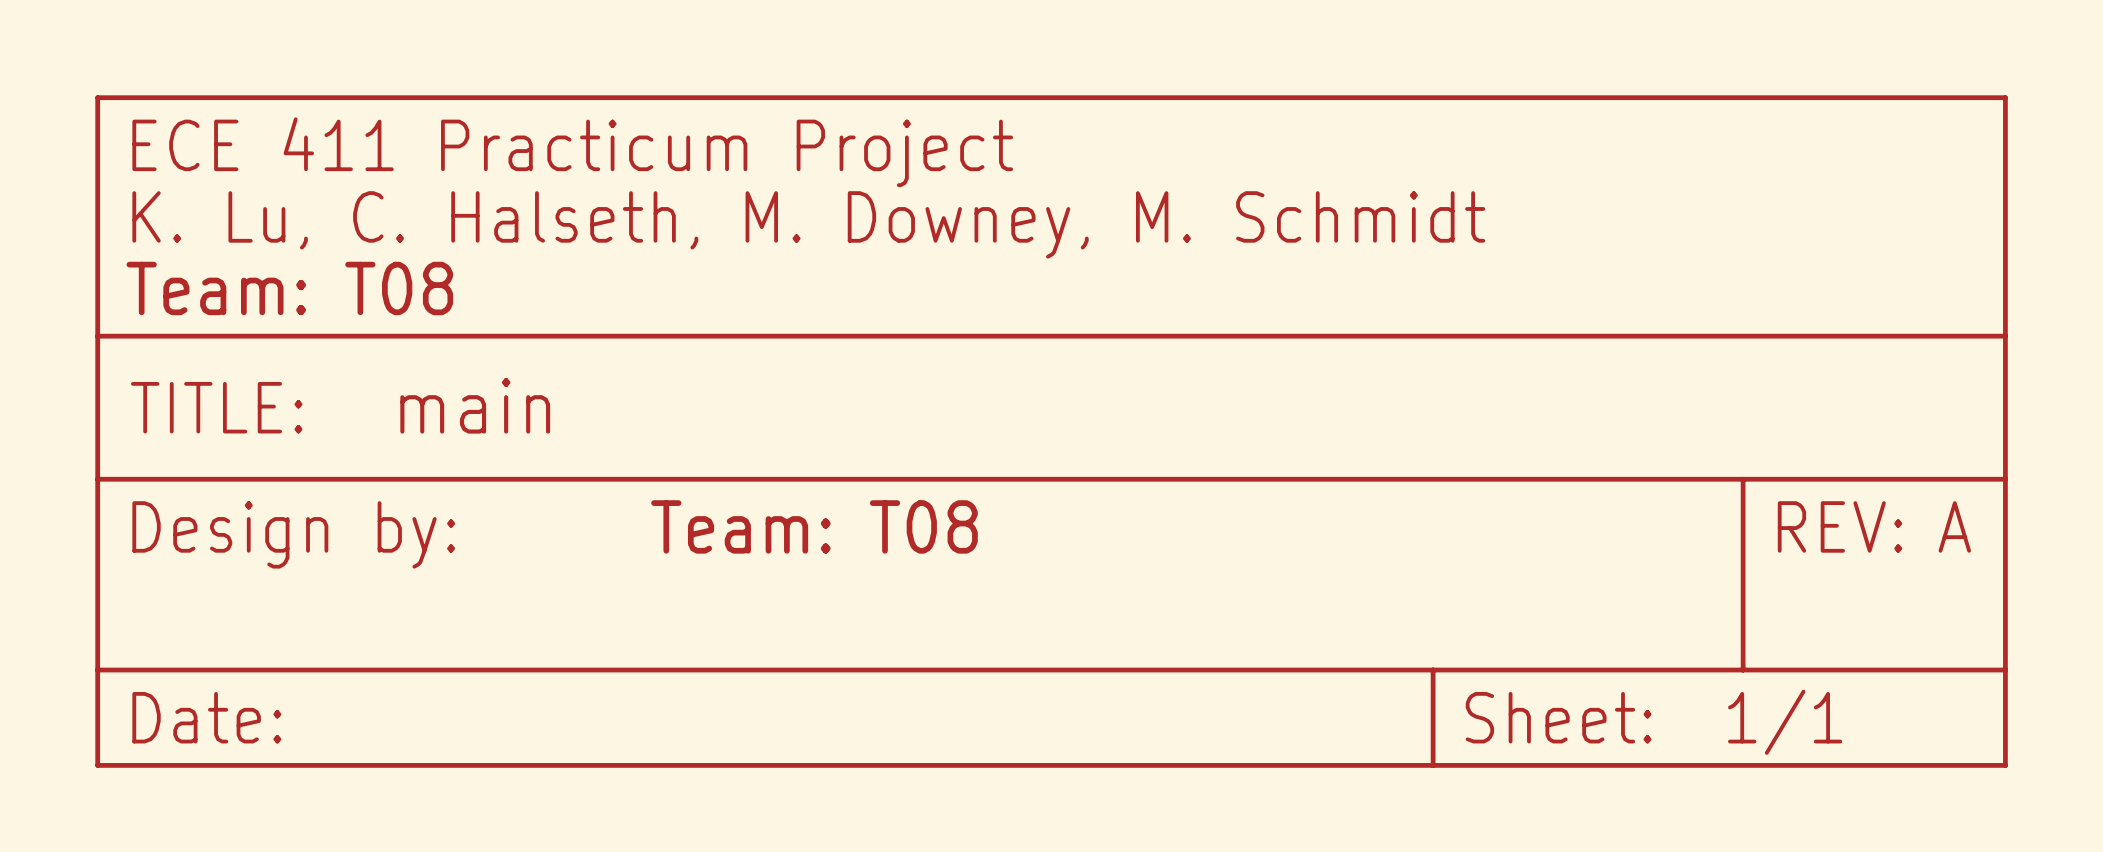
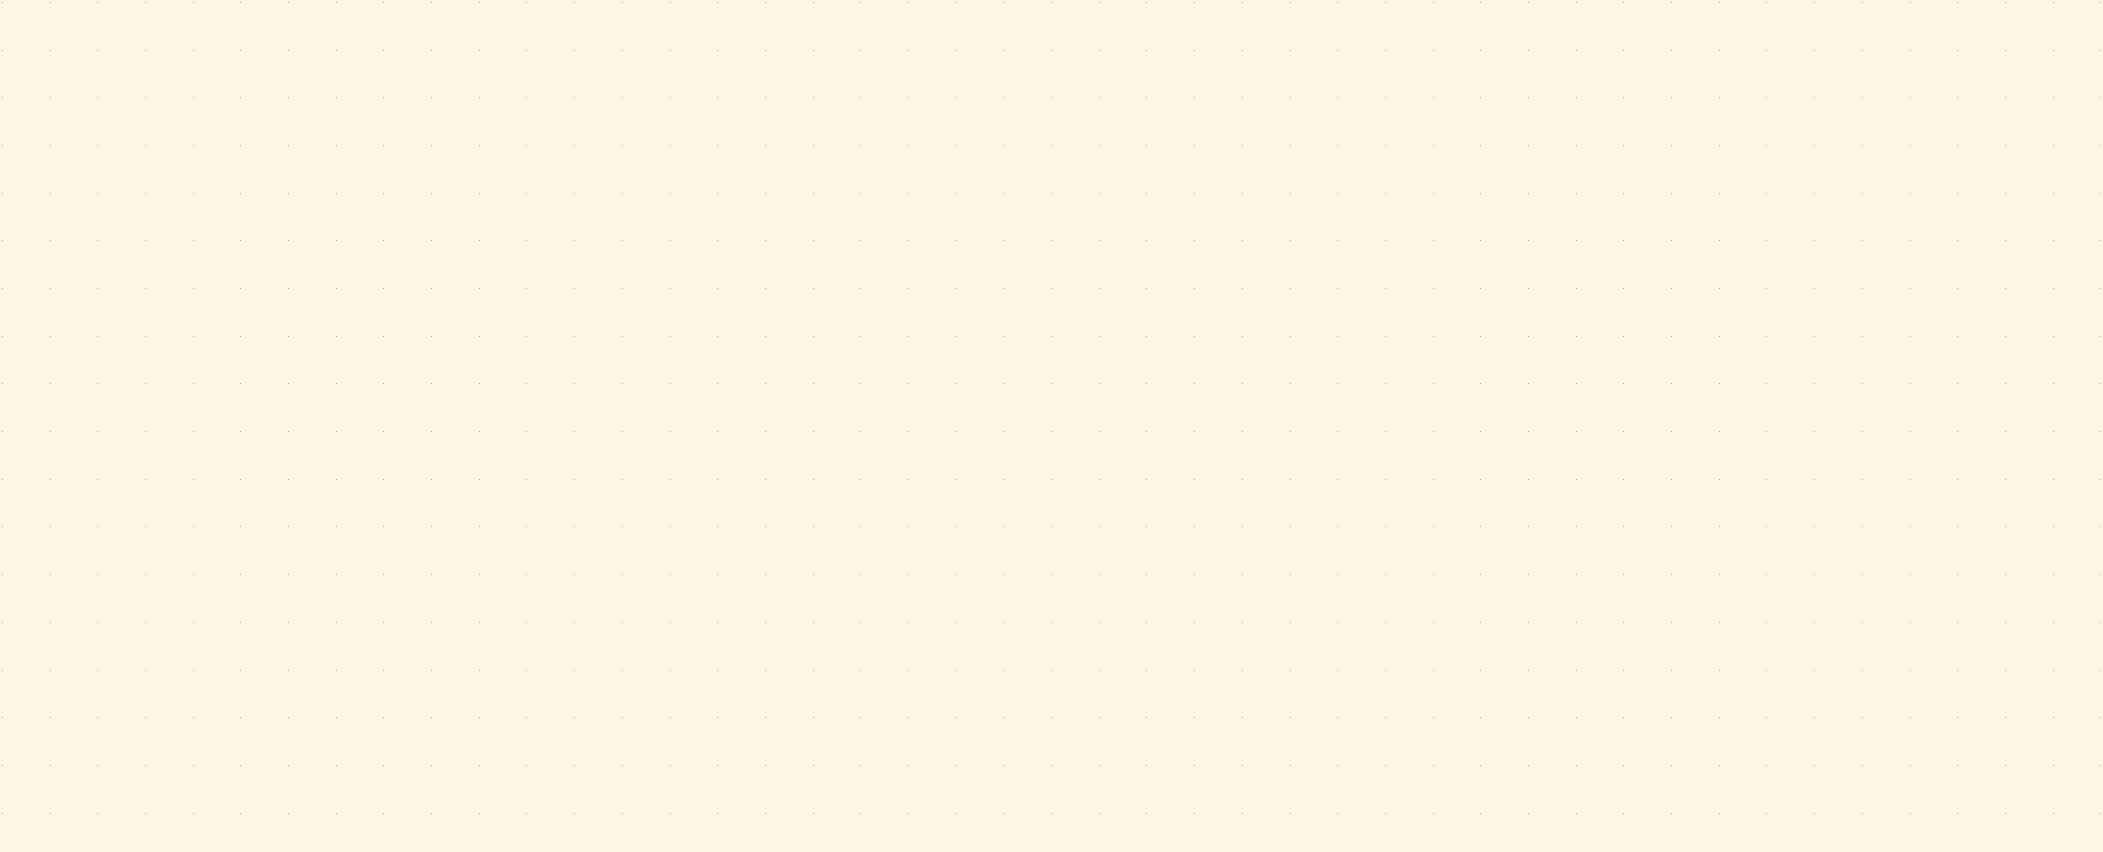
text: ECE 411 Practicum Project (572, 152) -> none
text: K. Lu, C. Halseth, M. Downey, M. Schmidt (808, 224) -> none
text: Team: T08 (289, 288) -> none
part: (1051, 431) -> none
text: Team: T08 (814, 526) -> none
text: A (1954, 526) -> none

